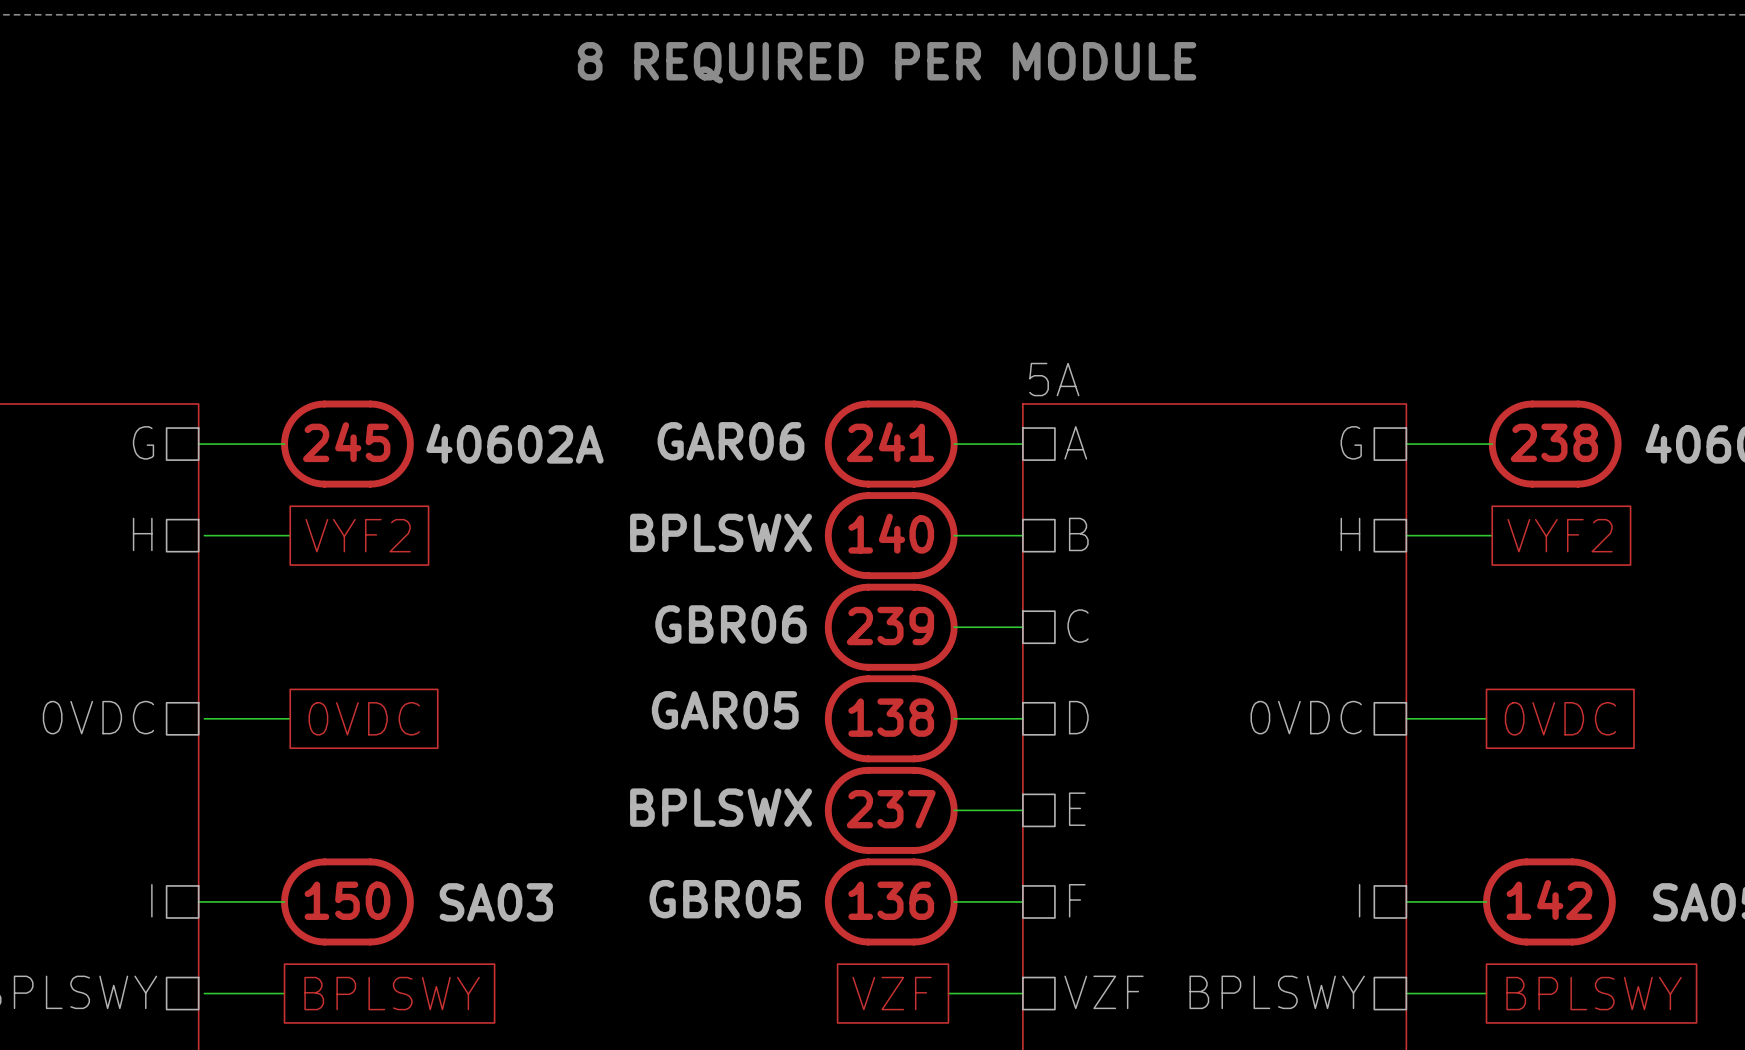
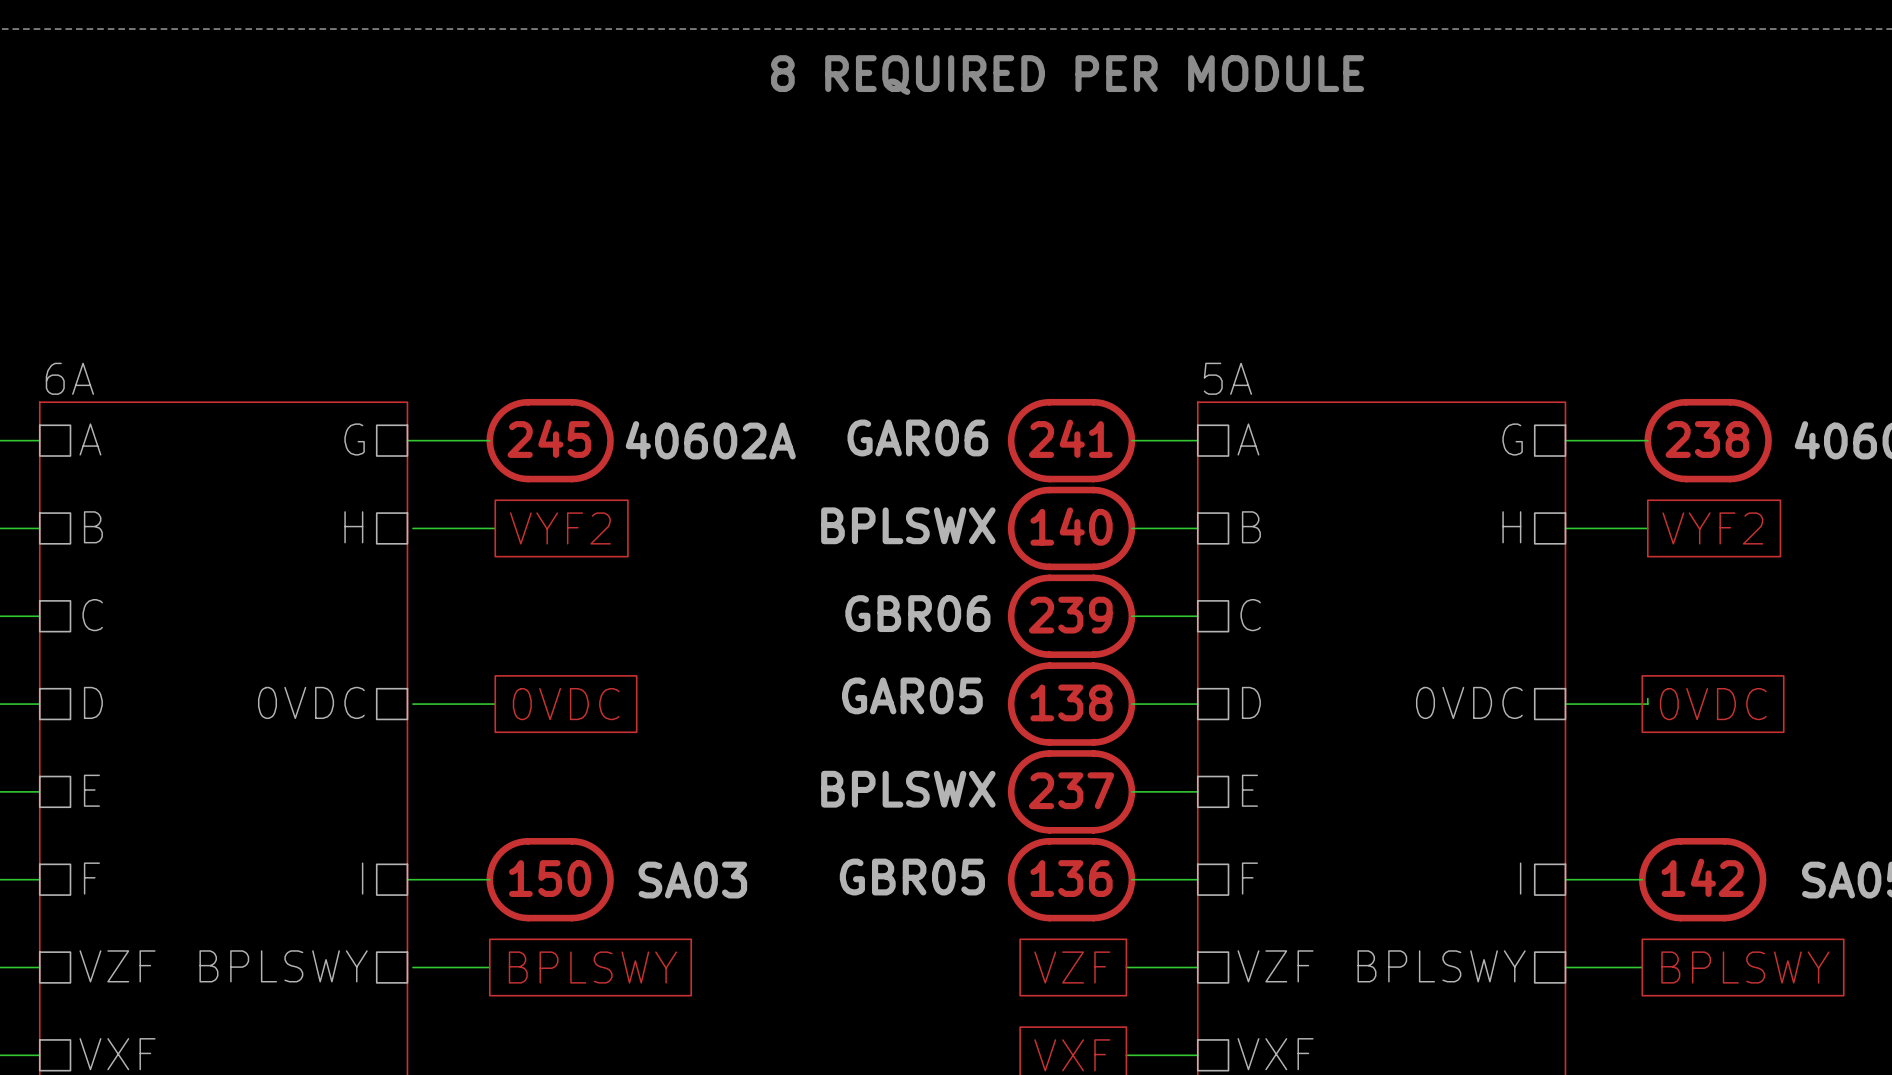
wire: none -> (1647, 698) (1647, 704) (1642, 704)

